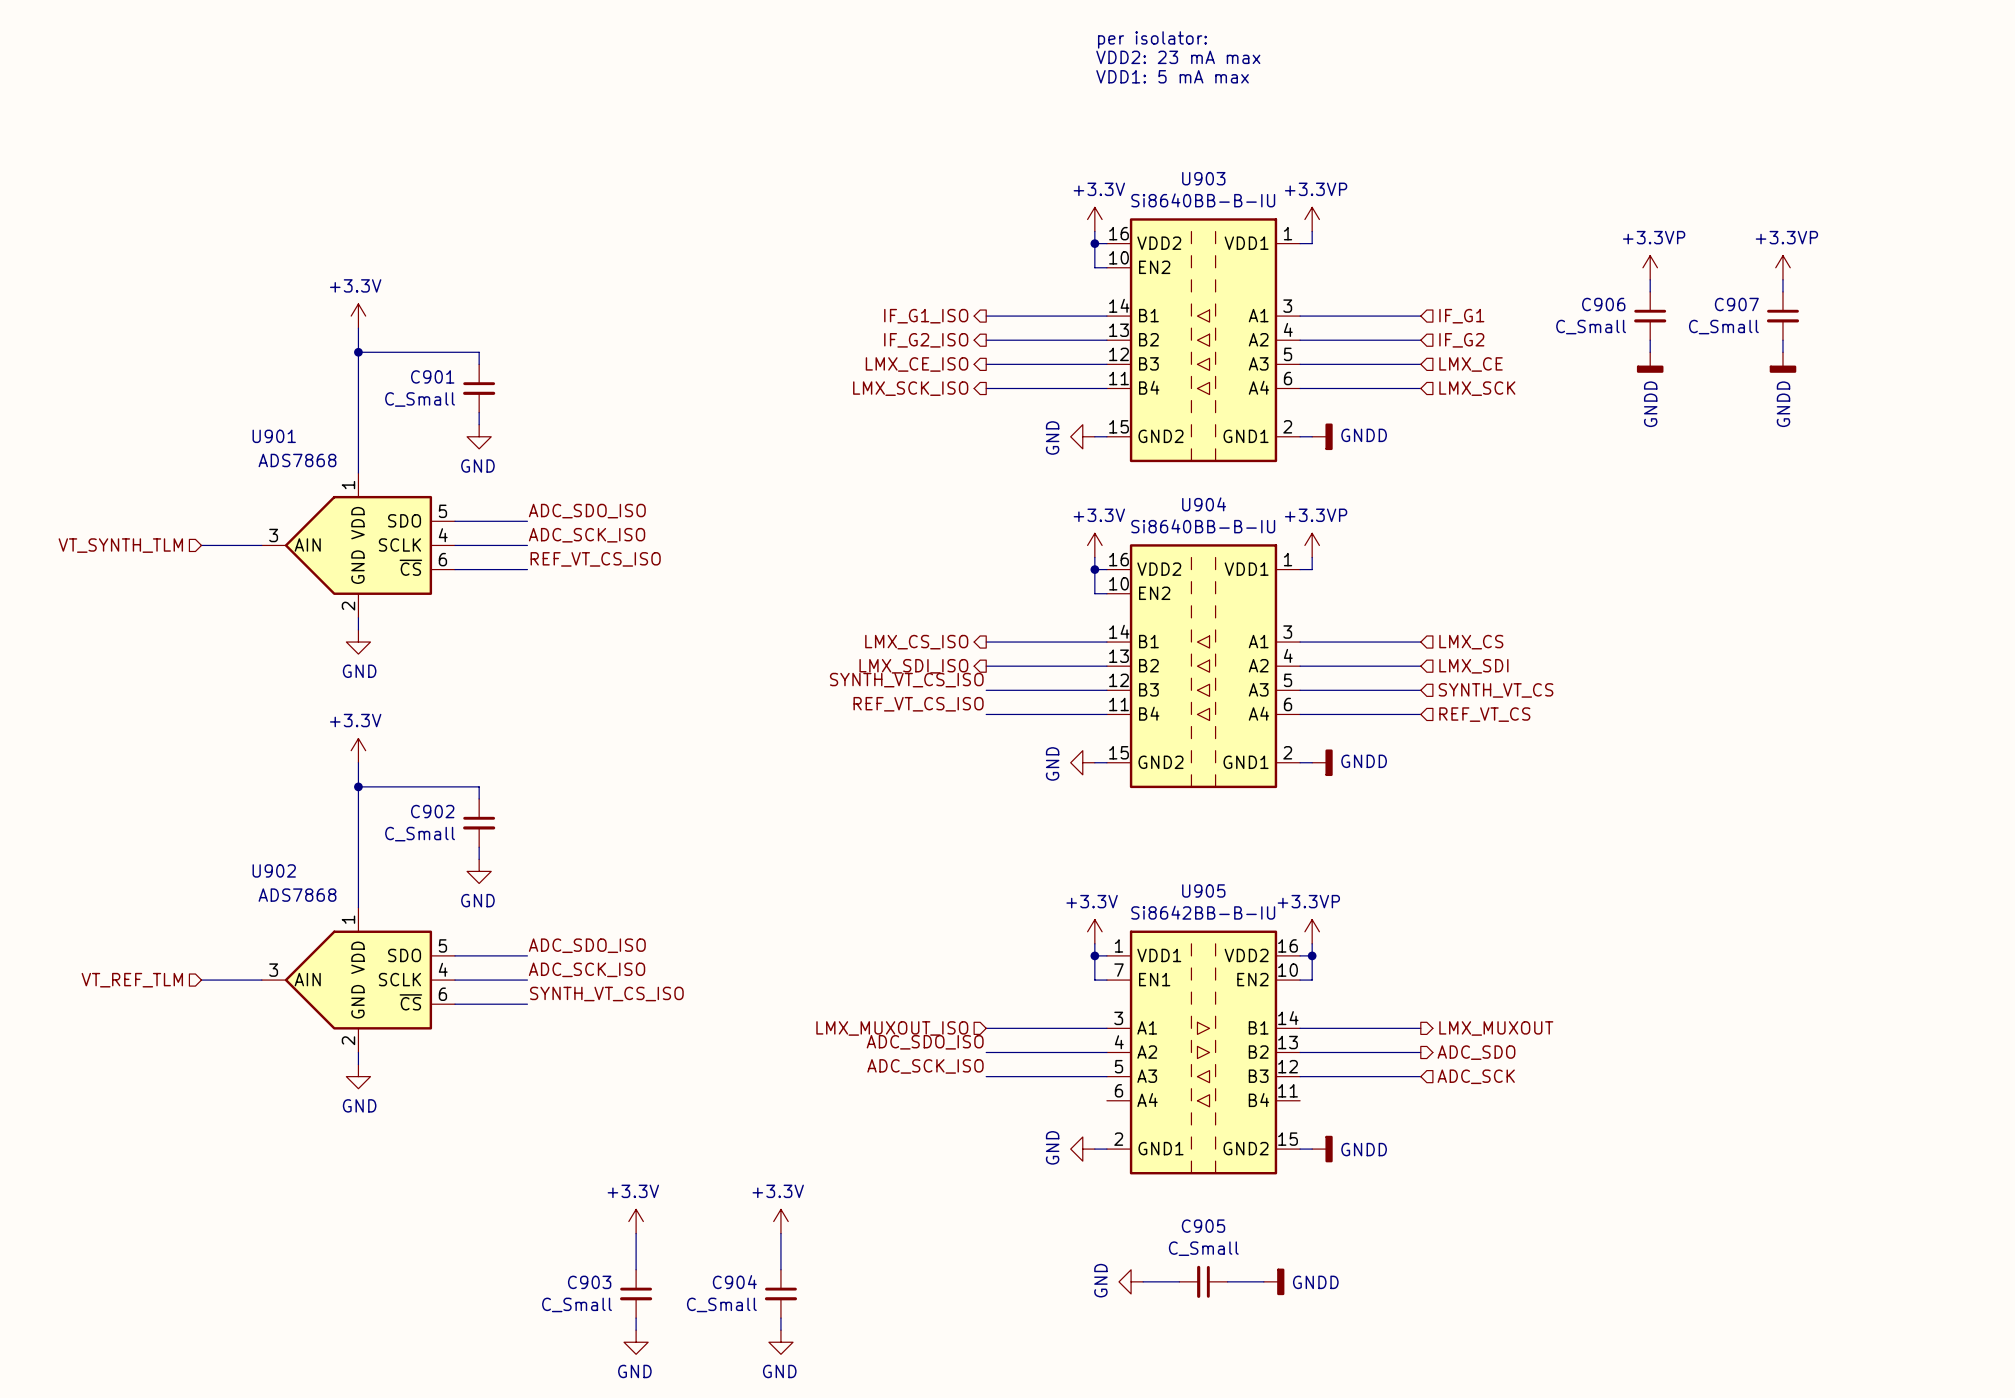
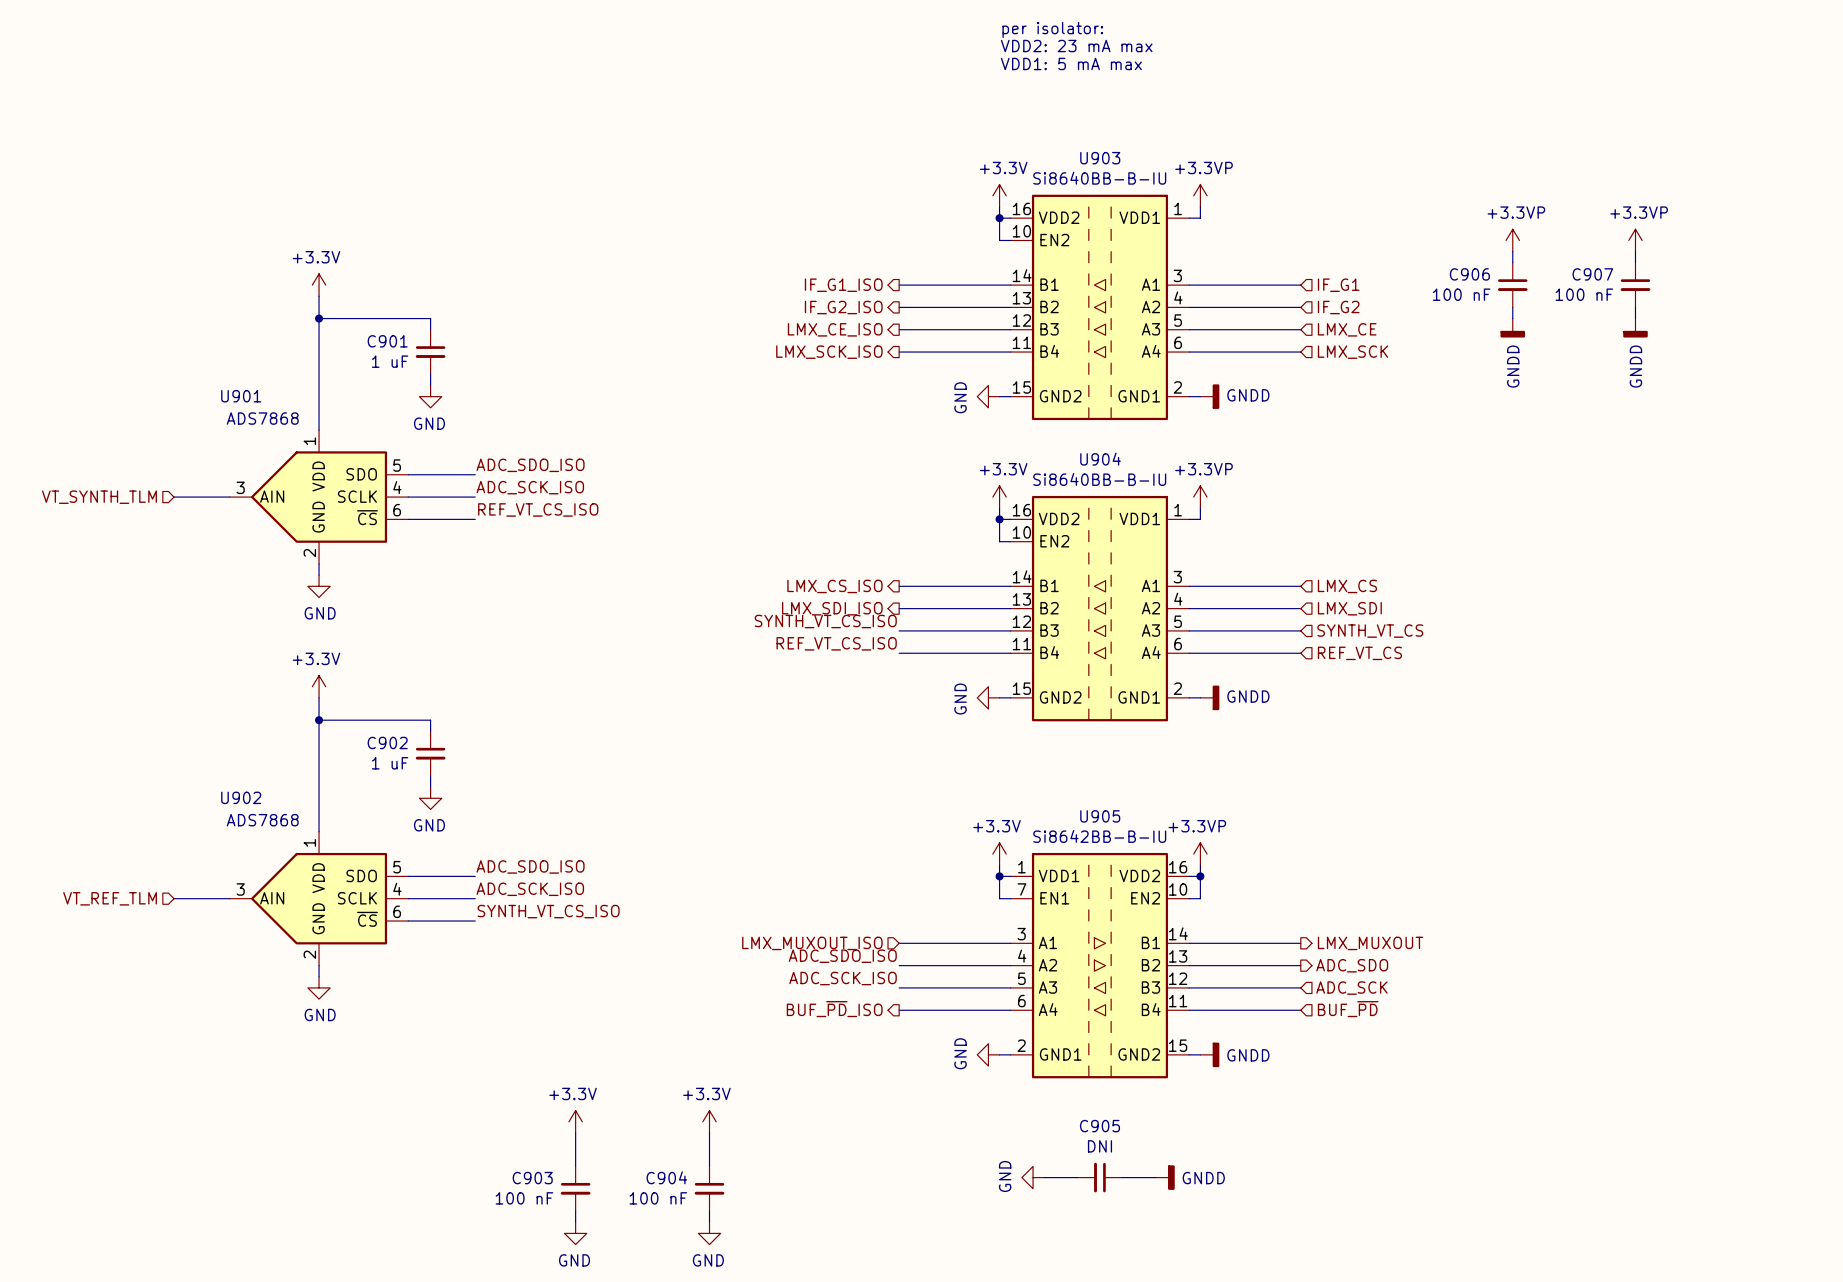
C906 value: C_Small (1591, 327) -> 100 nF (1461, 294)
C907 value: C_Small (1723, 327) -> 100 nF (1584, 294)
C901 value: C_Small (420, 399) -> 1 uF (390, 361)
C902 value: C_Small (420, 834) -> 1 uF (390, 763)
hierarchical label: none -> BUF_~{PD}_ISO (834, 1009)
hierarchical label: none -> BUF_~{PD} (1348, 1009)
wire: none -> (899, 1010) (1010, 1010)
wire: none -> (1189, 1010) (1300, 1010)
C905 value: C_Small (1203, 1248) -> DNI (1099, 1146)
C903 value: C_Small (577, 1304) -> 100 nF (524, 1198)
C904 value: C_Small (721, 1304) -> 100 nF (658, 1198)

